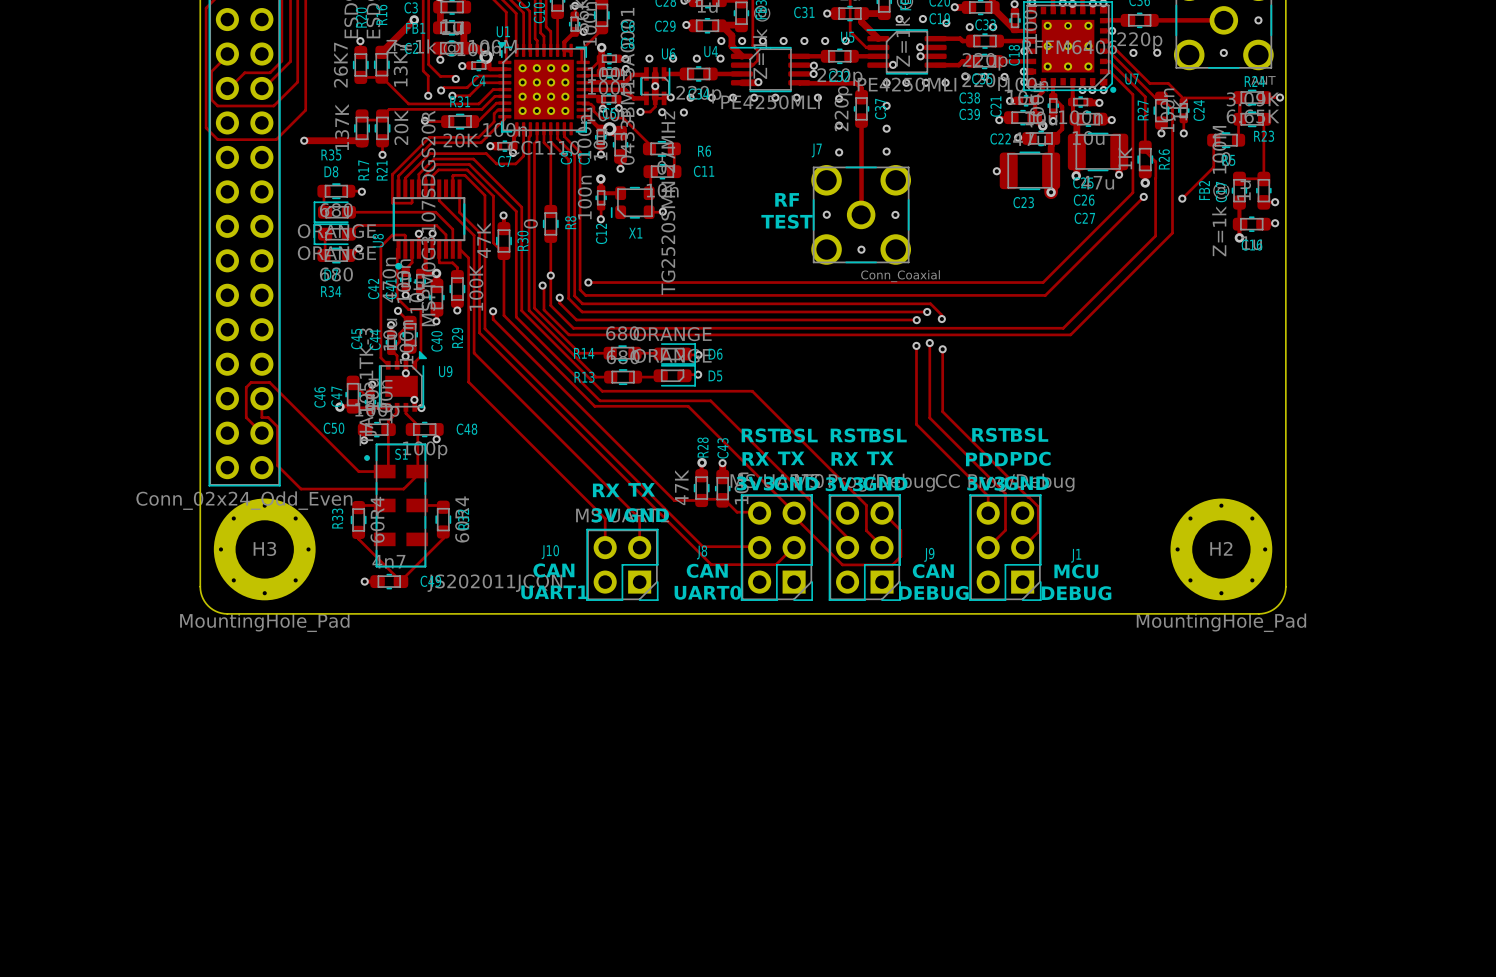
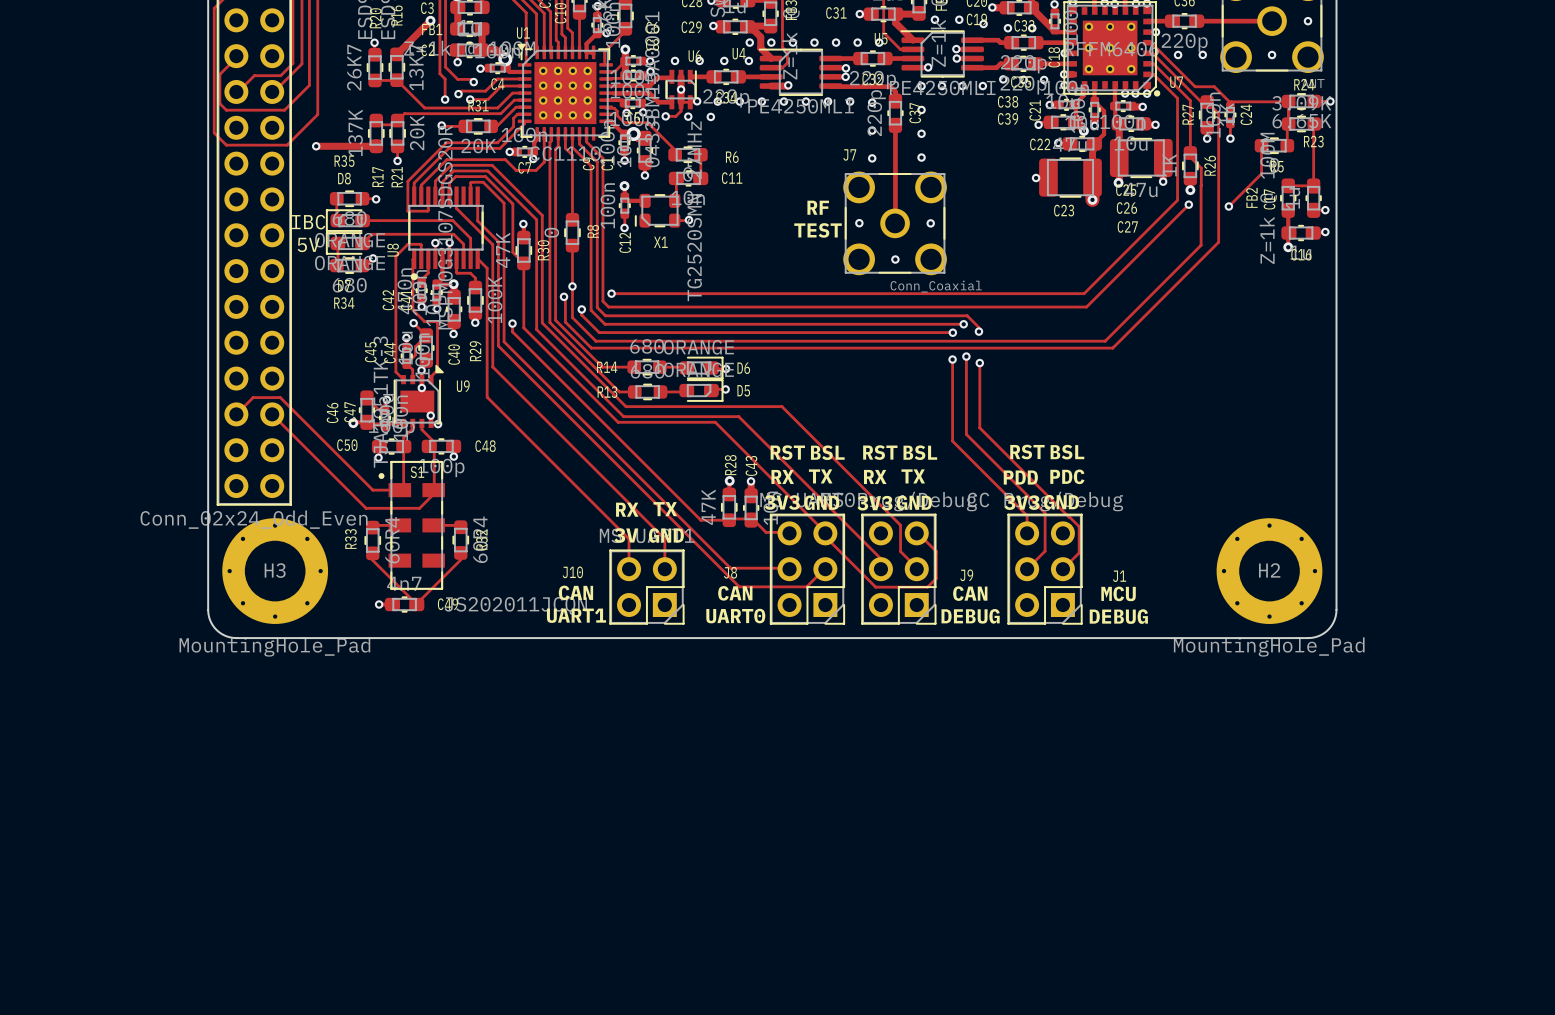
text: none -> IBC (308, 222)
text: none -> 5V (308, 244)
track: (251, 382) (246, 387) (246, 417) (261, 433) -> (261, 397) (253, 397) (236, 414)
track: (261, 398) (261, 417) (268, 417) (277, 426) (277, 465) (301, 489) (352, 489) -> (272, 414) (366, 508)

